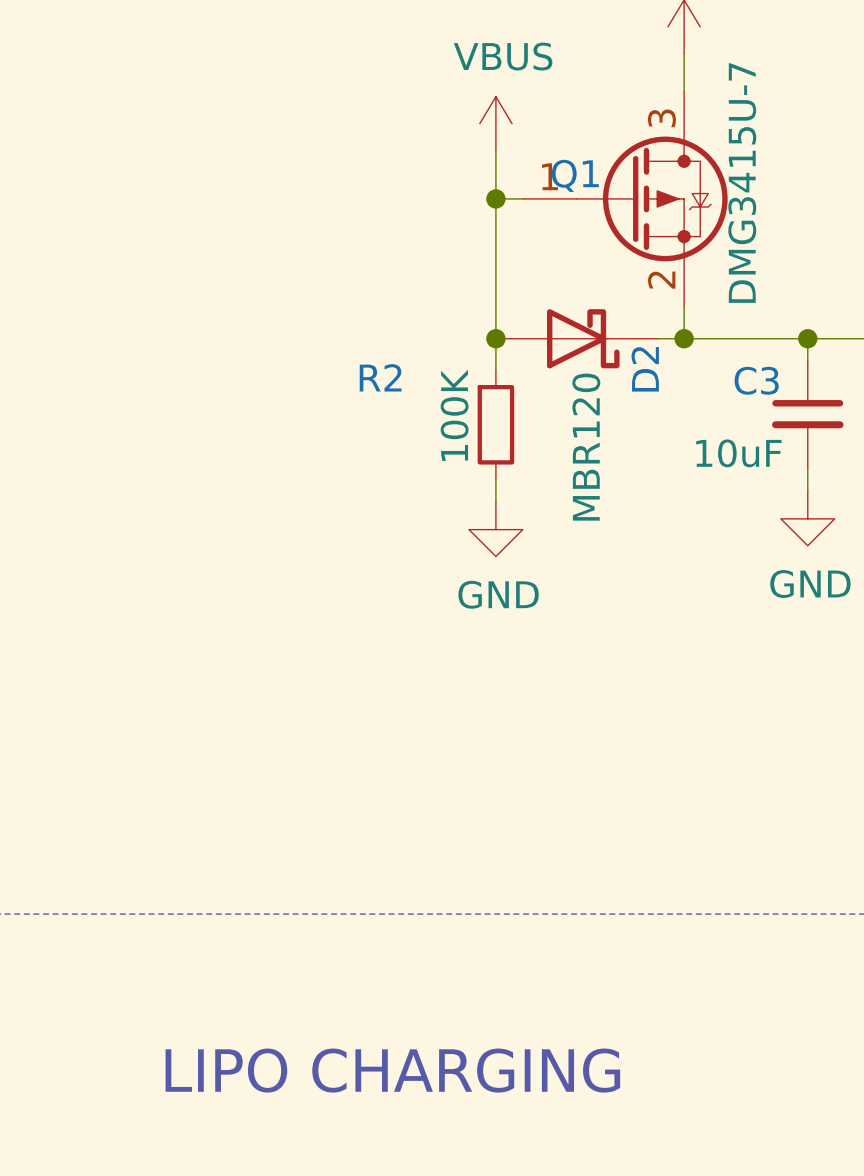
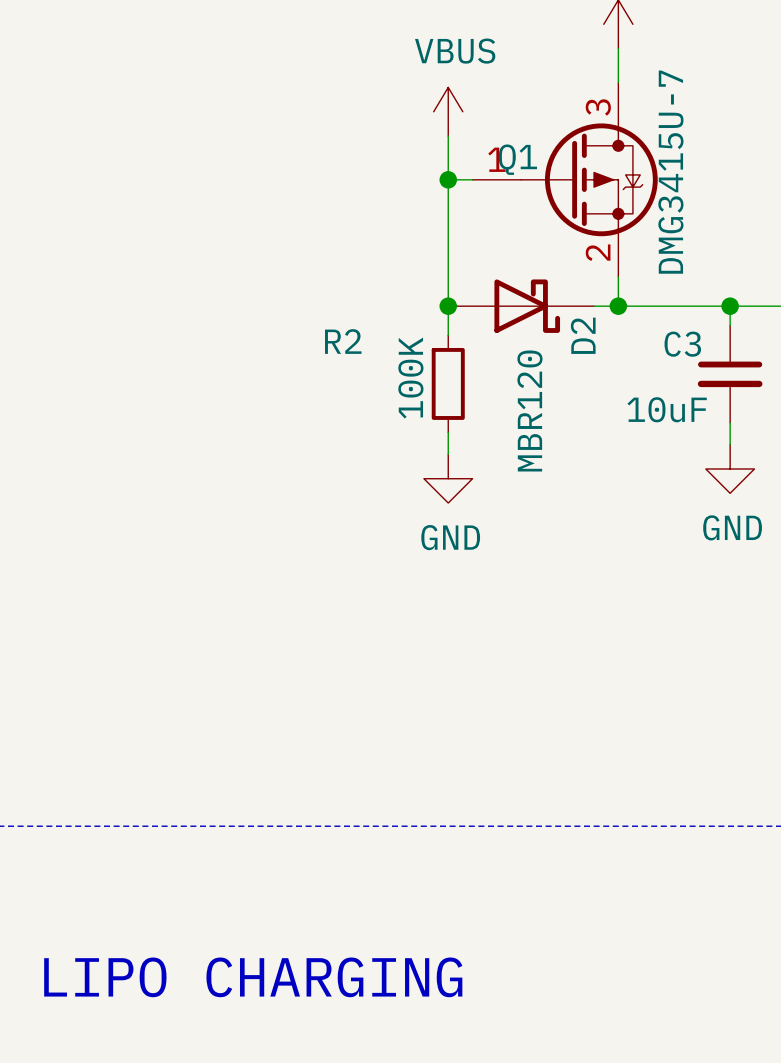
text position: LIPO CHARGING (392, 1070) -> LIPO CHARGING (253, 977)

